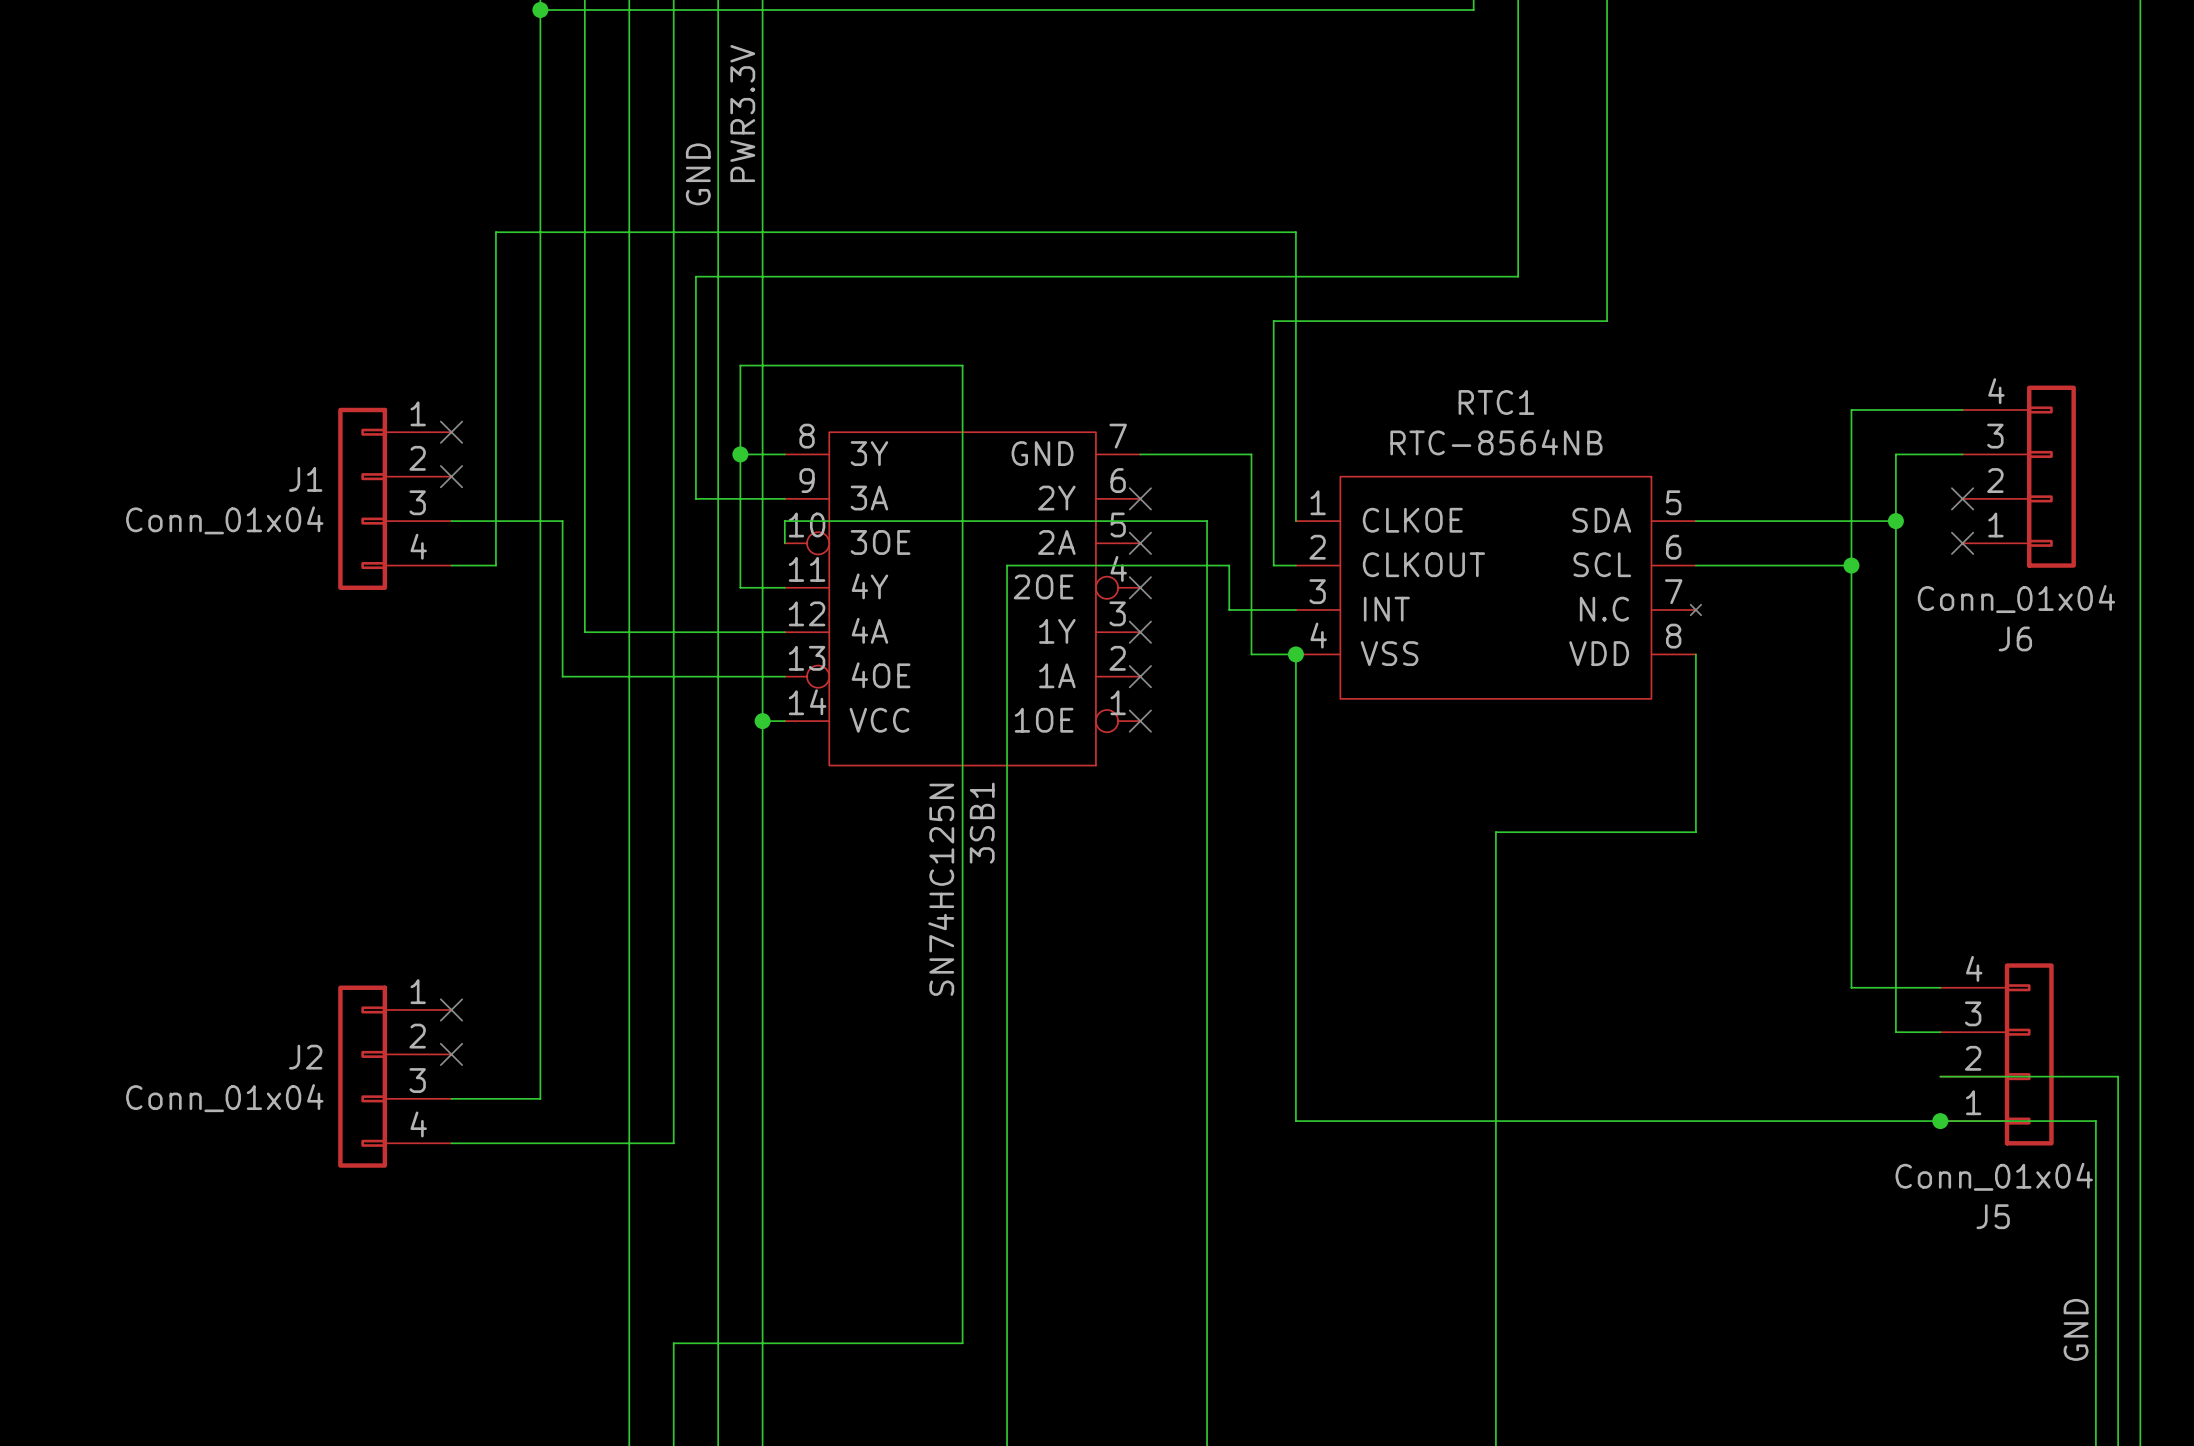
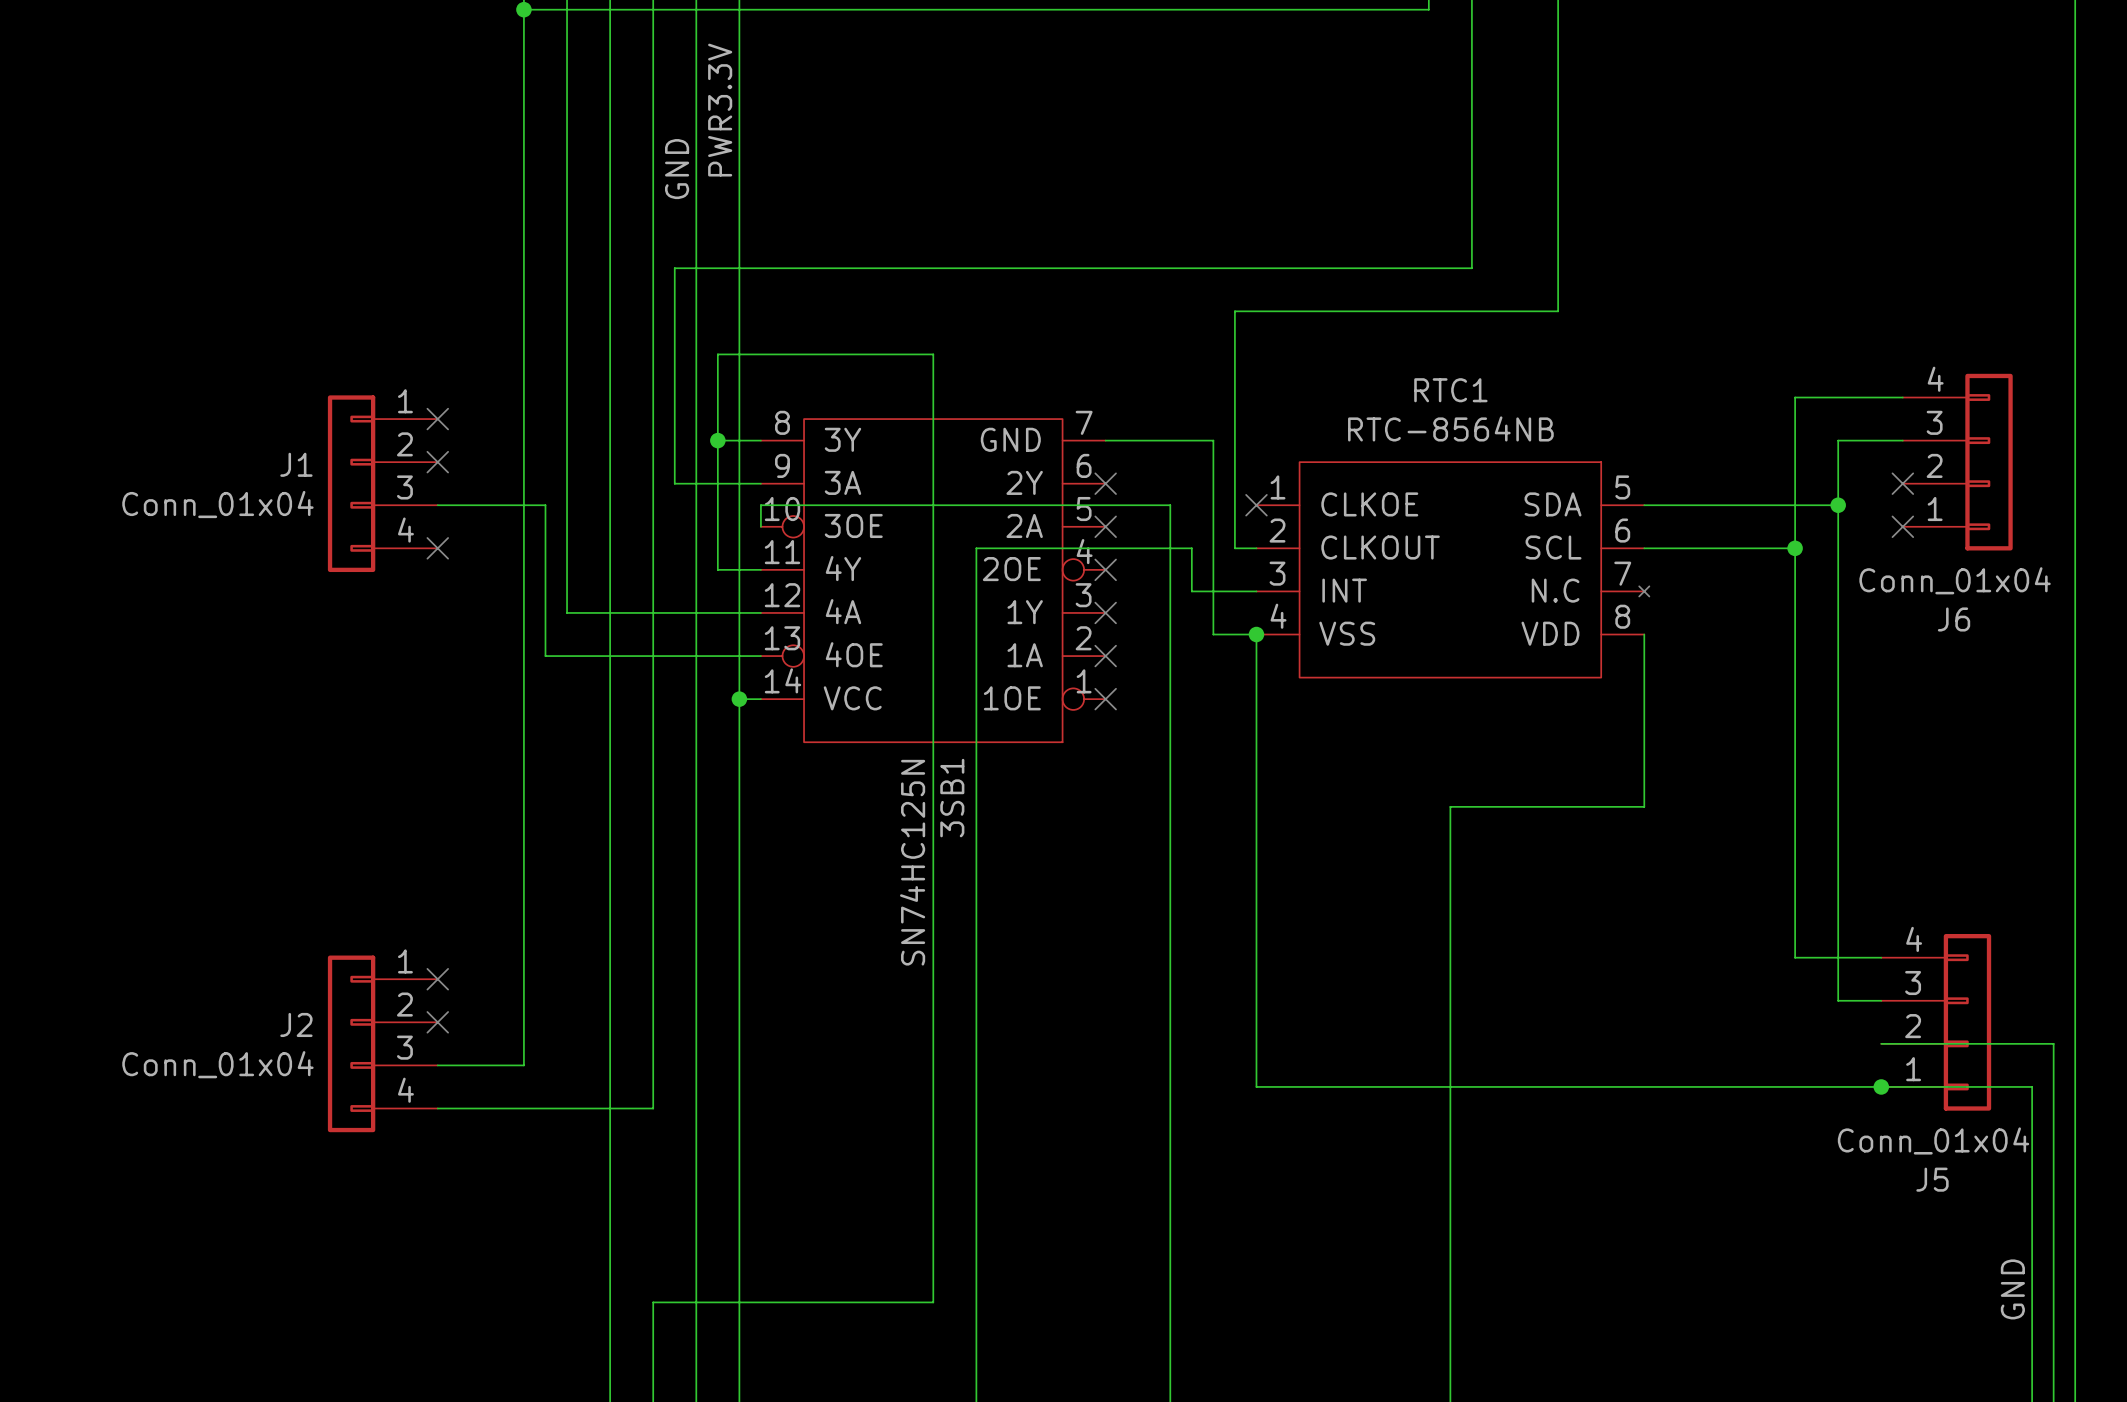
wire: (1295, 521) (1295, 232) (495, 232) (495, 565) (451, 565) -> none
no-connect mark: none -> (1256, 505)
no-connect mark: none -> (437, 548)

